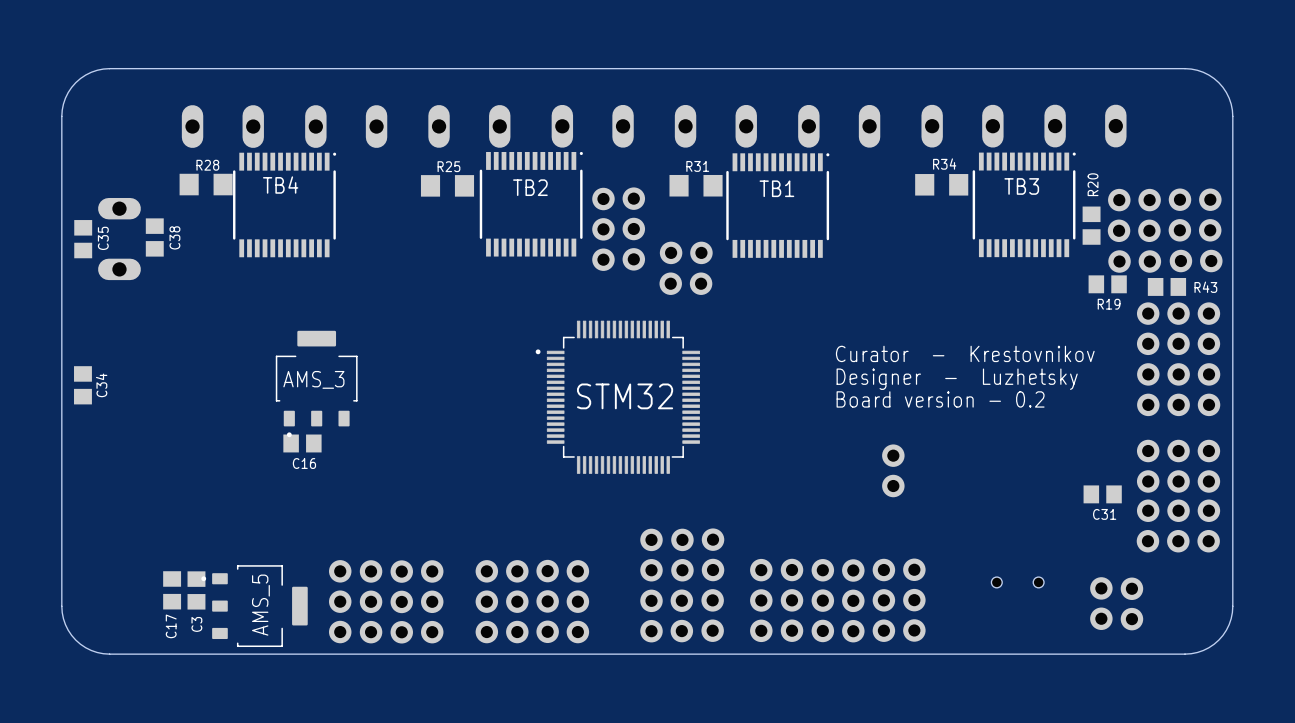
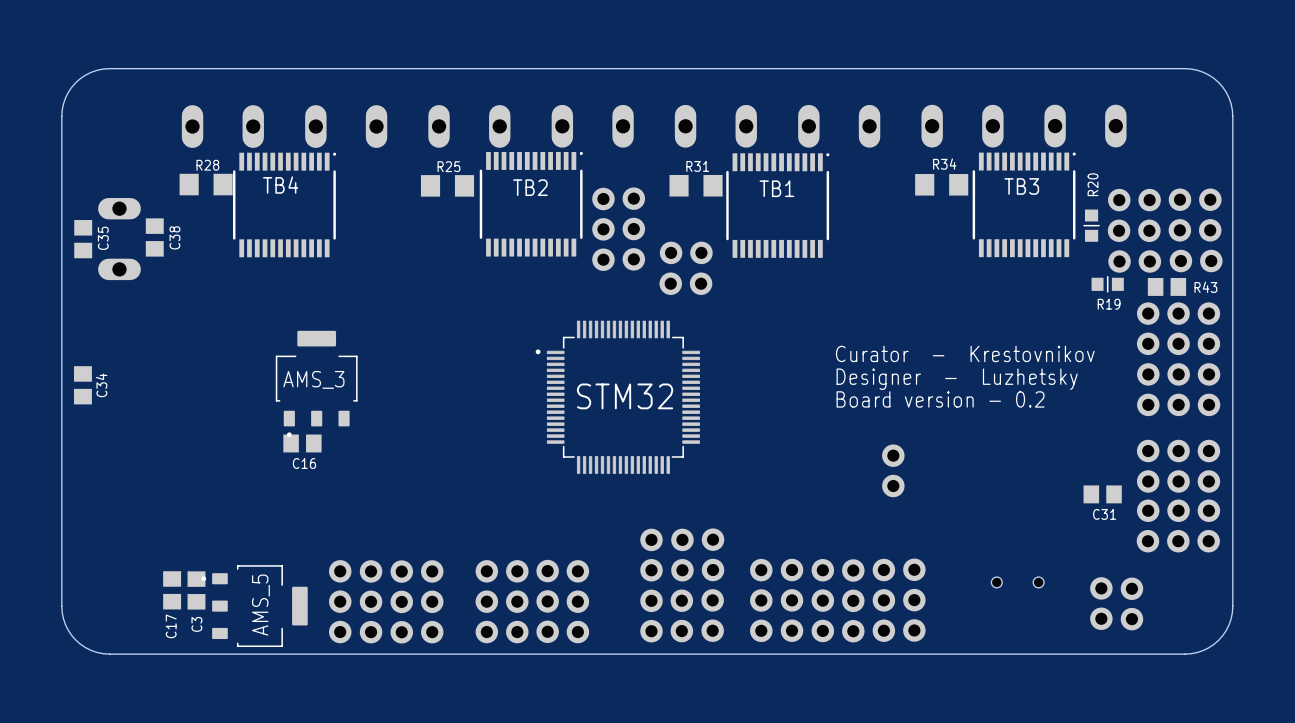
R20 footprint: [1082, 206, 1101, 245] -> [1083, 209, 1100, 242]
R19 footprint: [1088, 275, 1127, 294] -> [1091, 275, 1124, 293]

